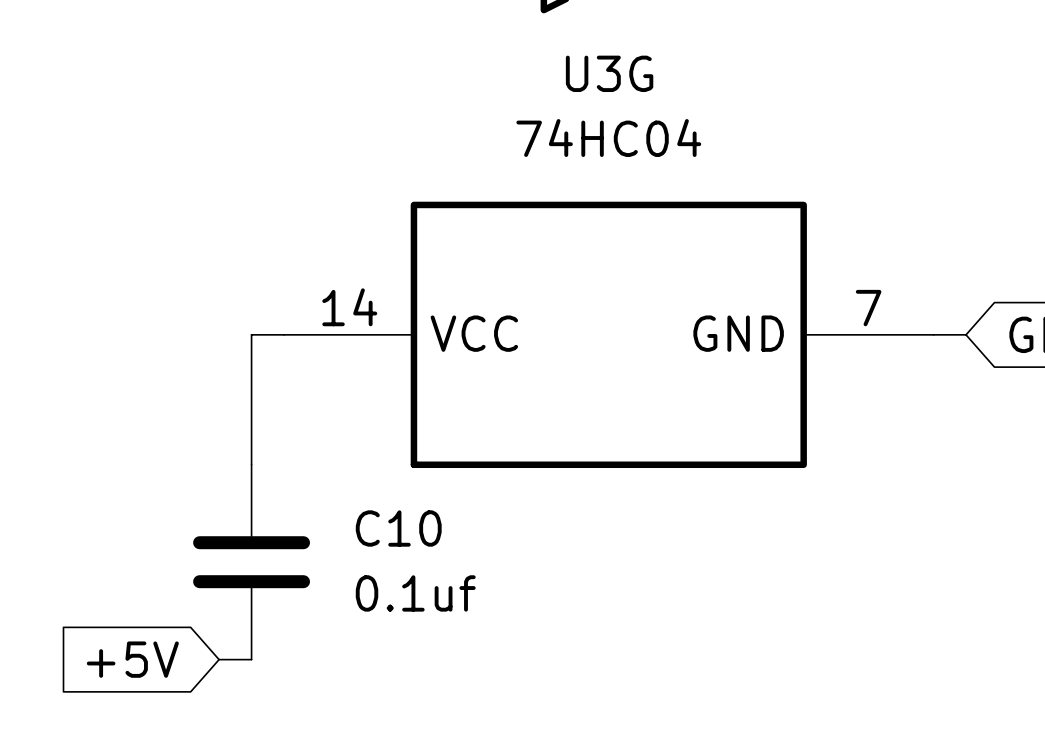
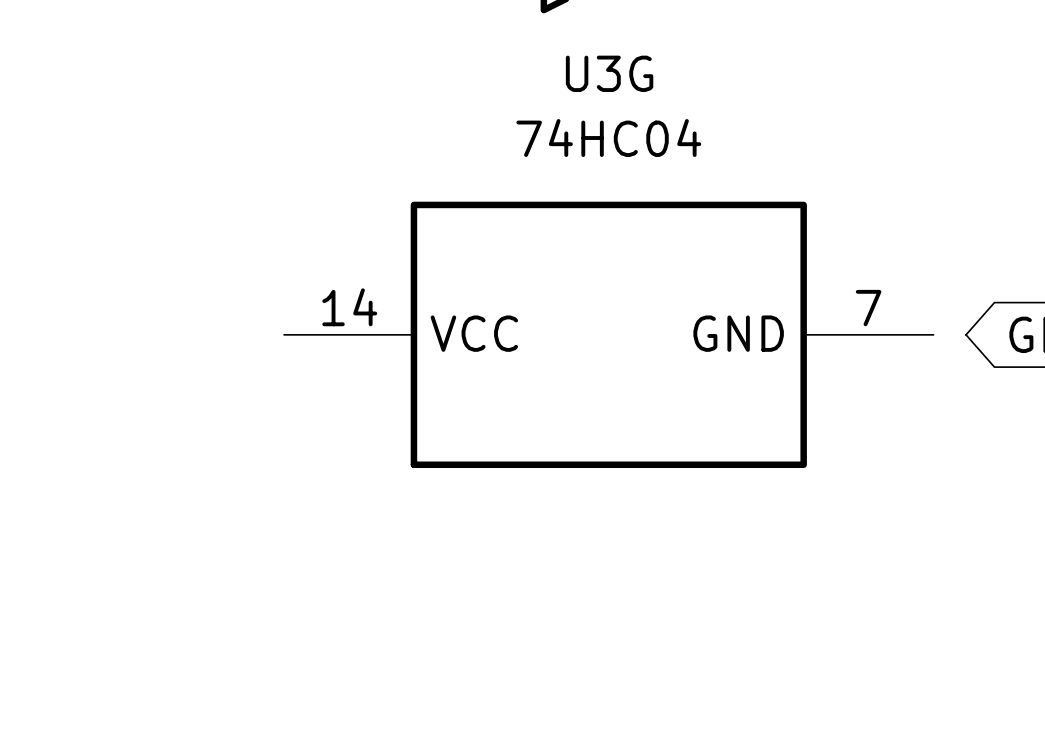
wire: (284, 334) (251, 334) (251, 464) -> none
wire: (933, 334) (966, 334) -> none
C10: 0.1uf (251, 562) -> none
global label: +5V (132, 659) -> none
wire: (219, 659) (251, 659) -> none

